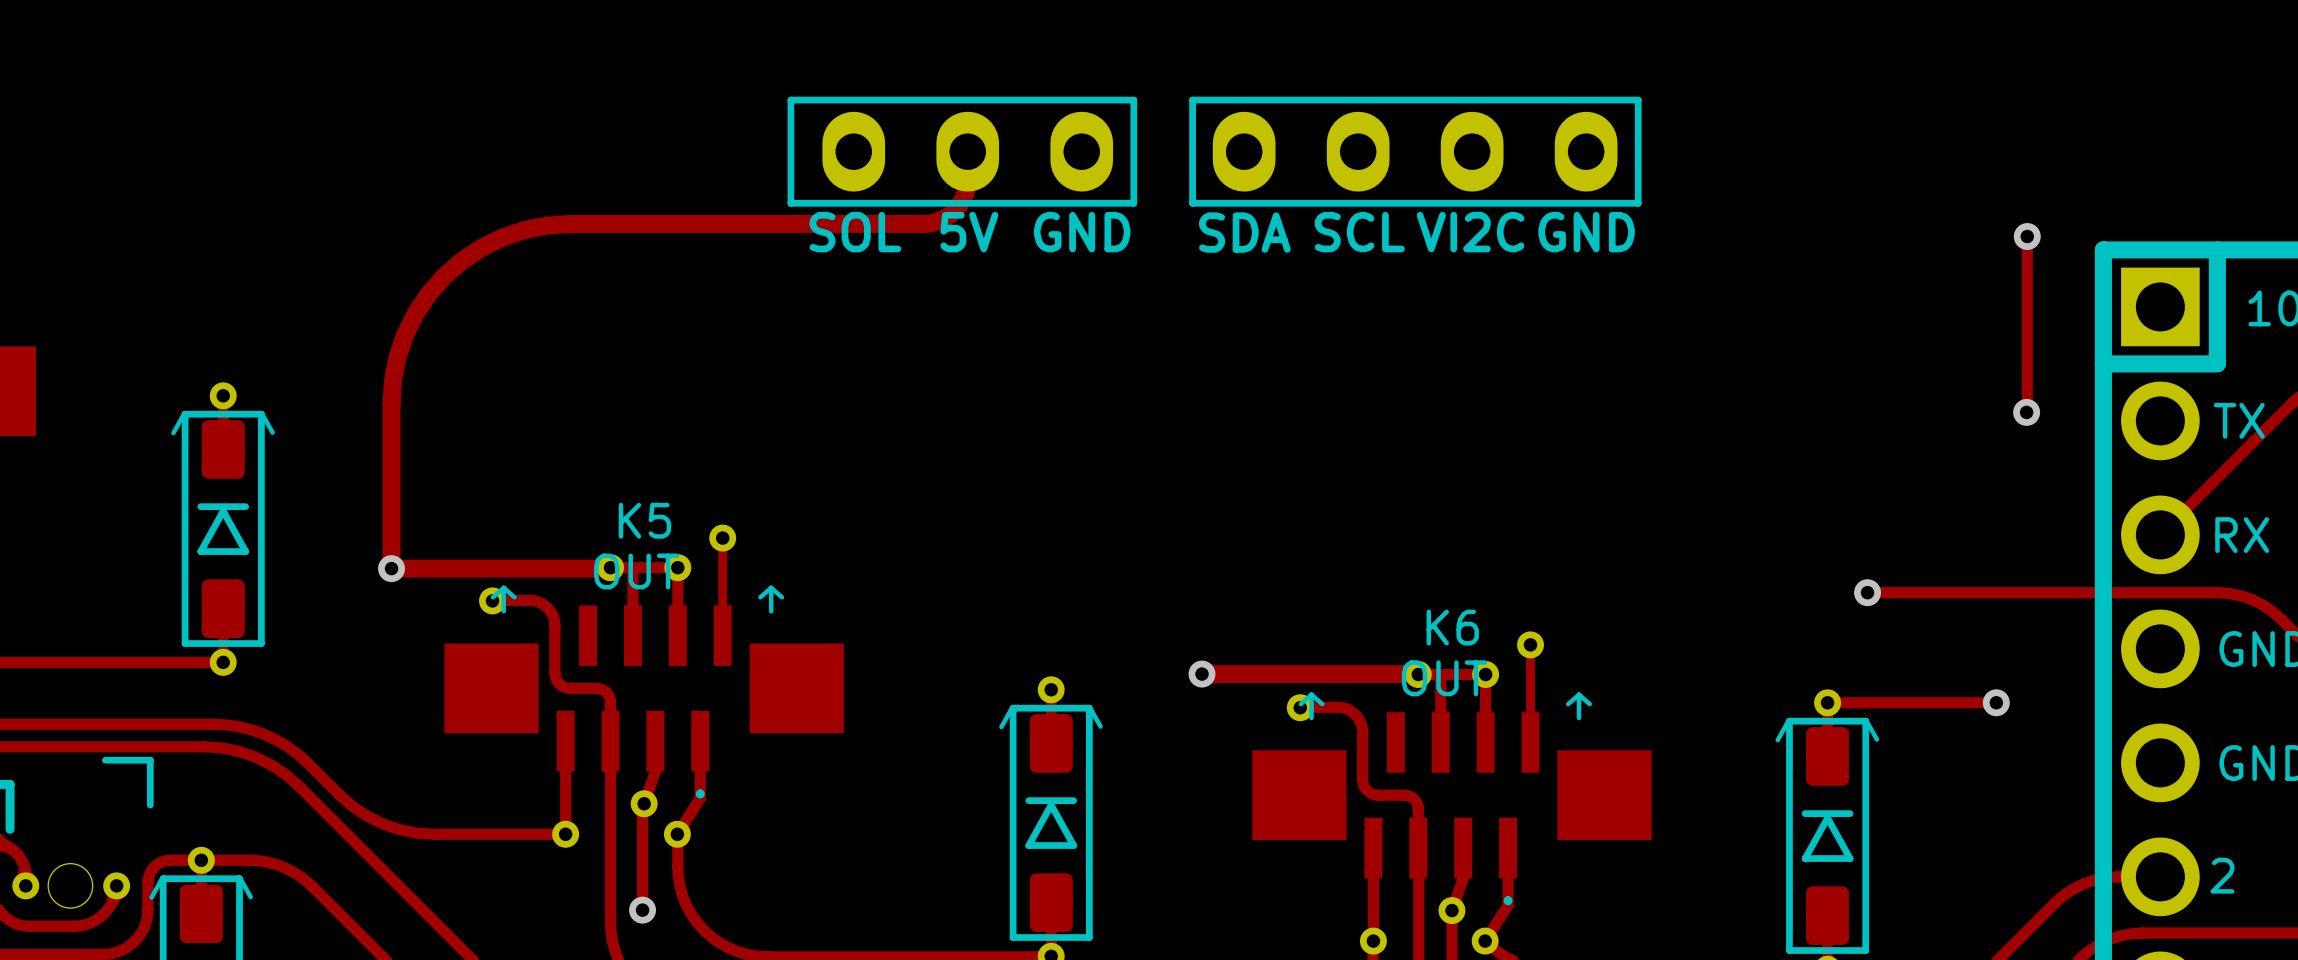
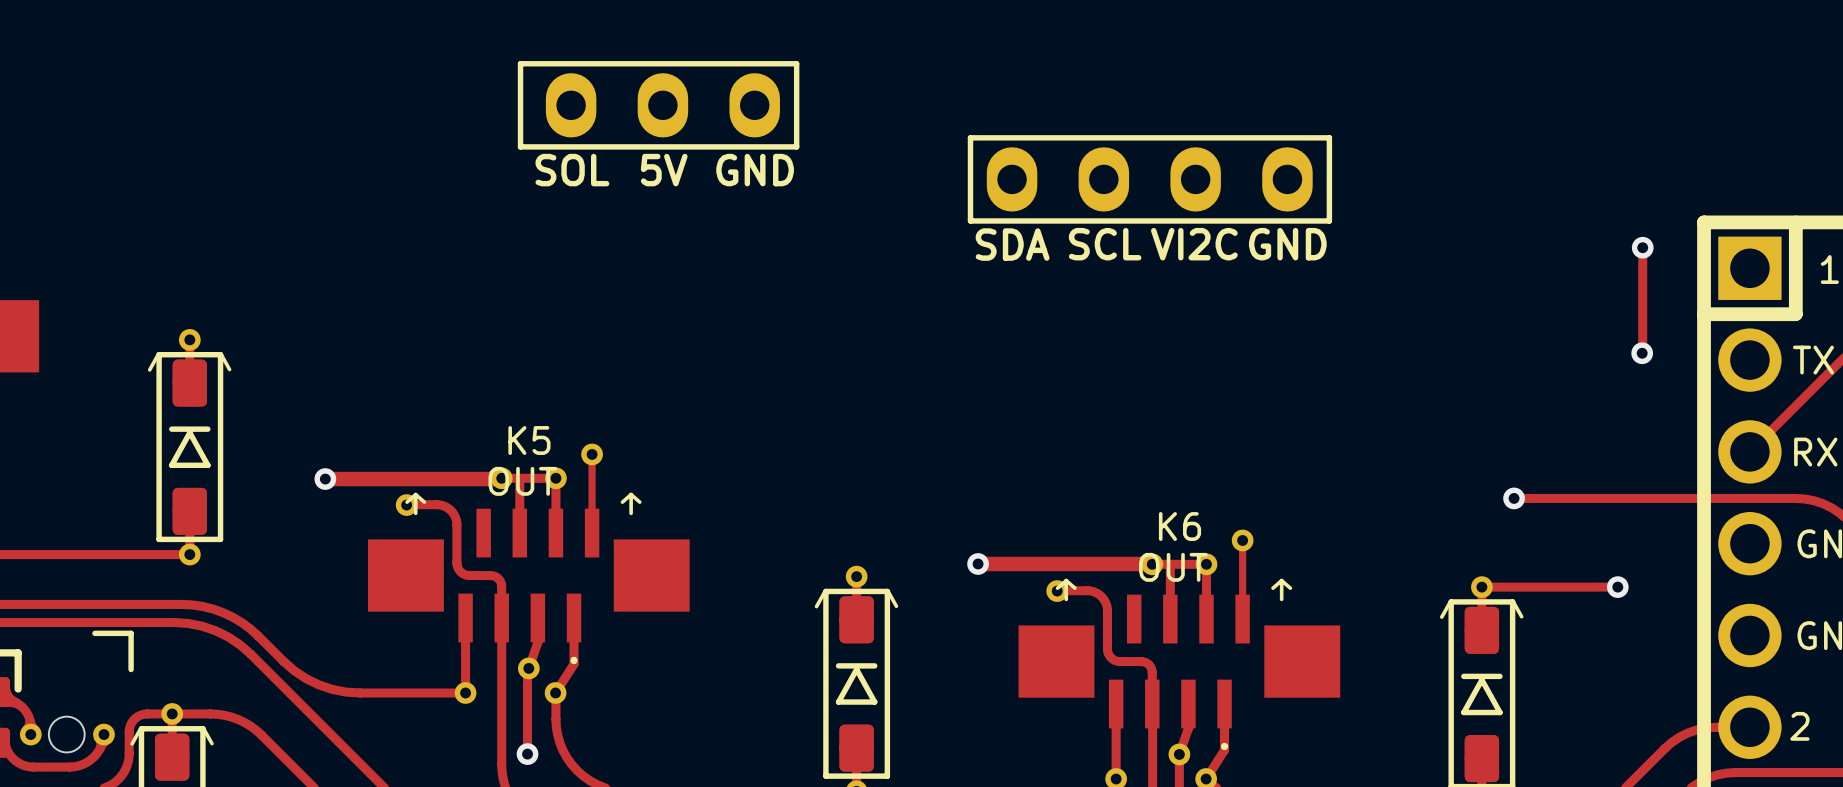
part position: (962, 151) -> (658, 105)
track: (967, 151) (967, 184) (963, 198) (950, 214) (932, 222) (547, 225) (524, 230) (502, 237) (481, 248) (461, 261) (444, 276) (428, 294) (415, 313) (405, 334) (397, 357) (393, 380) (391, 403) (391, 568) -> none
part position: (1415, 151) -> (1149, 179)
track: (2027, 236) (2027, 281) -> none
via position: (2027, 236) -> (1642, 247)

